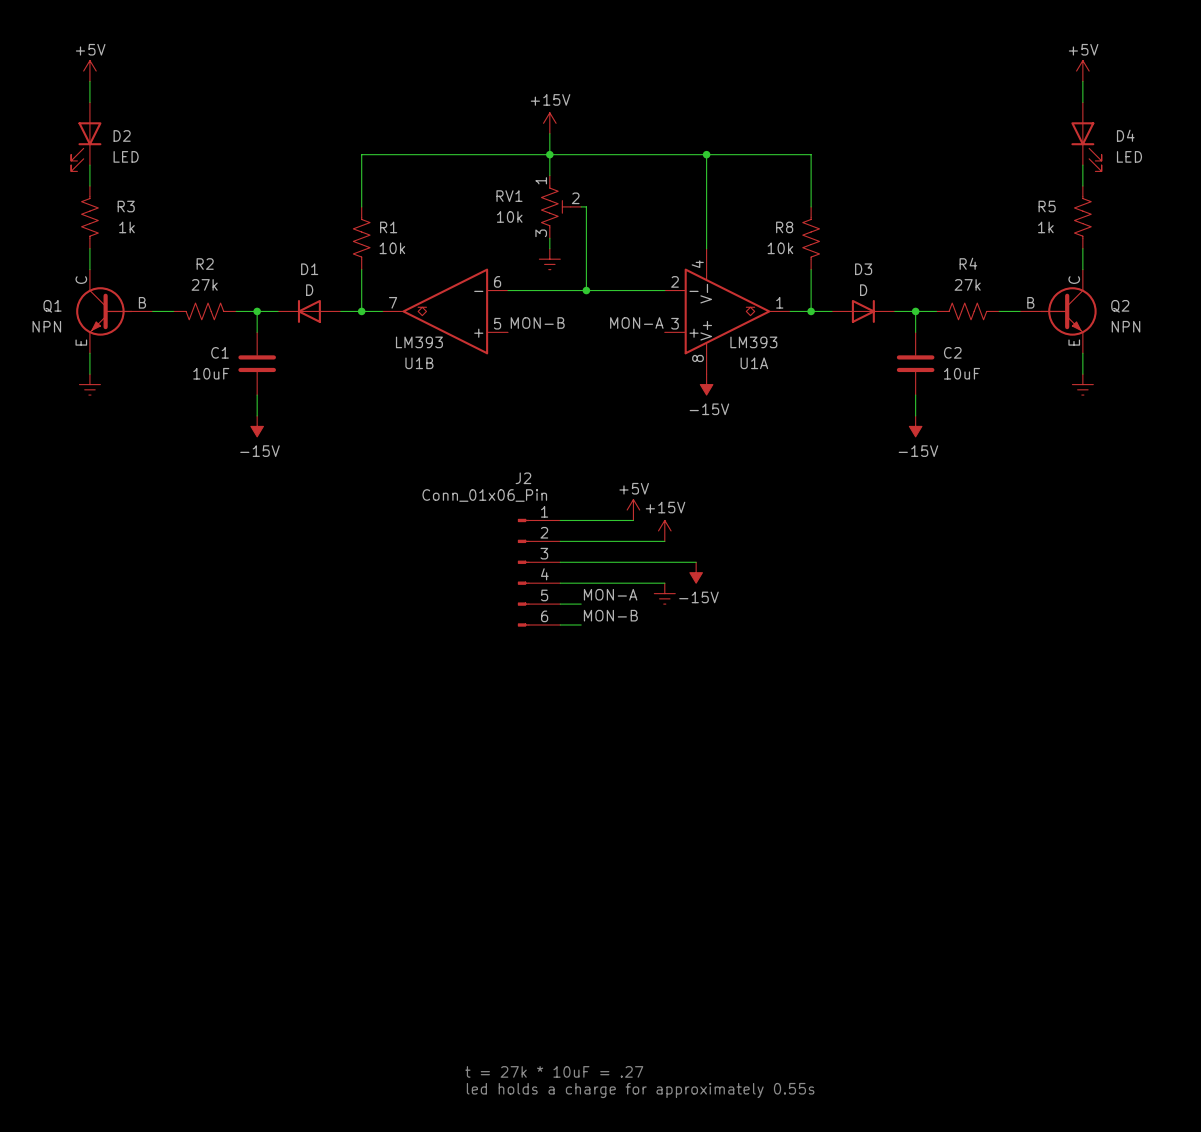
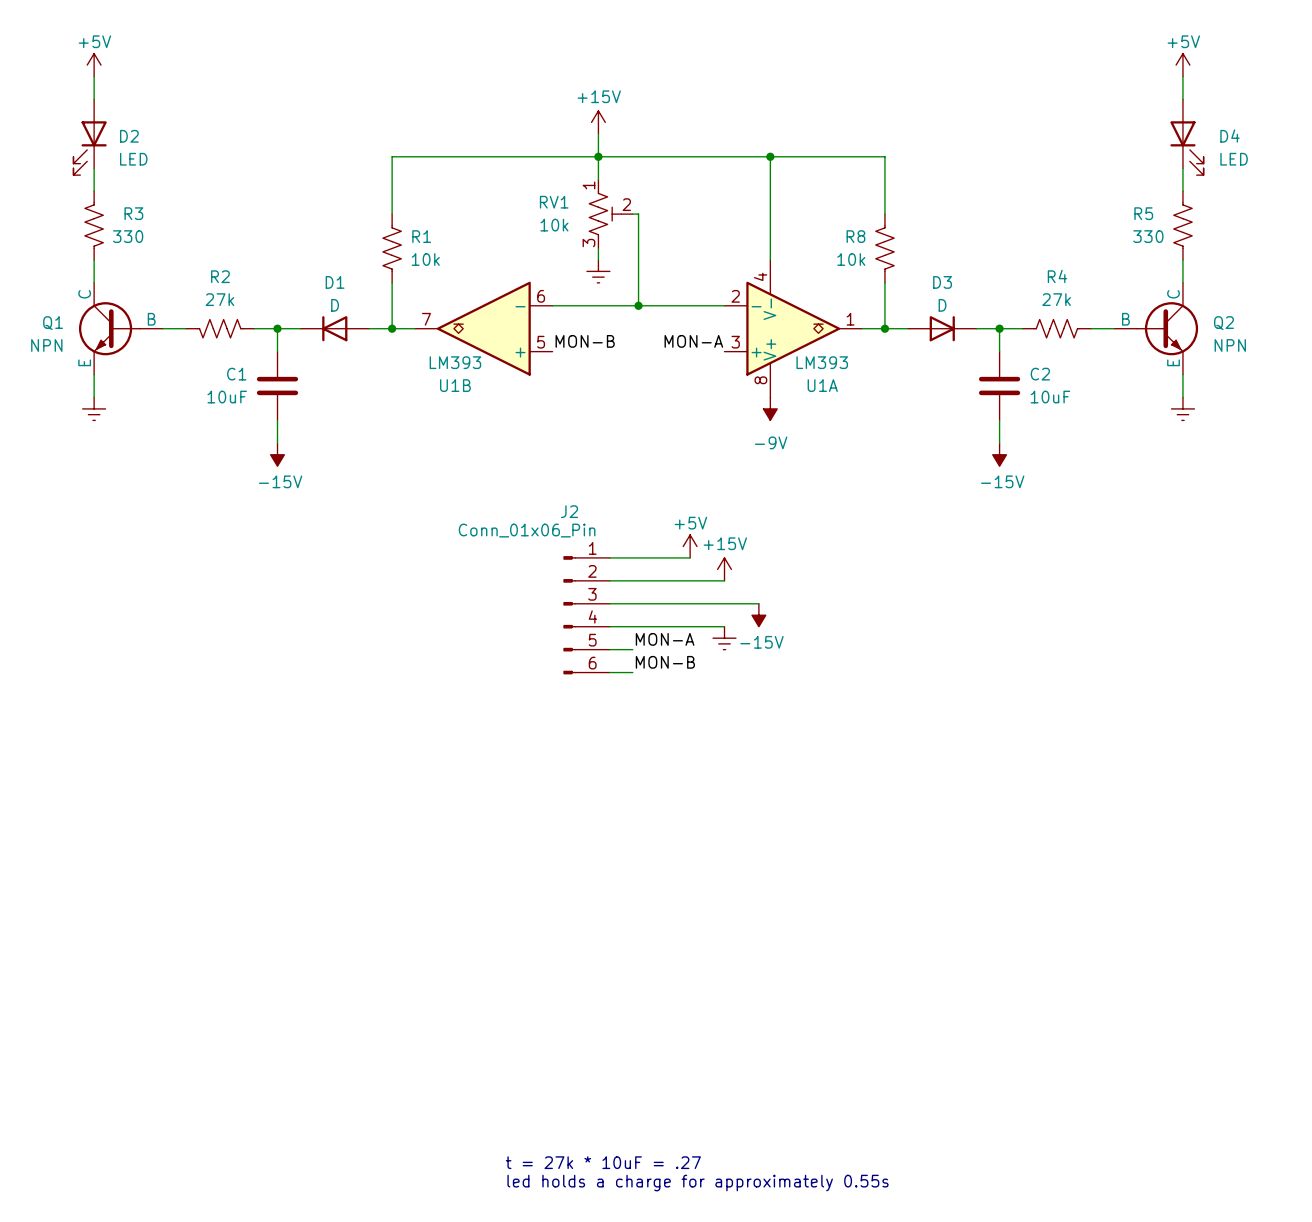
R3 value: 1k (126, 227) -> 330 (128, 236)
R5 value: 1k (1045, 227) -> 330 (1148, 236)
power symbol: -15V (706, 384) -> -9V (770, 408)

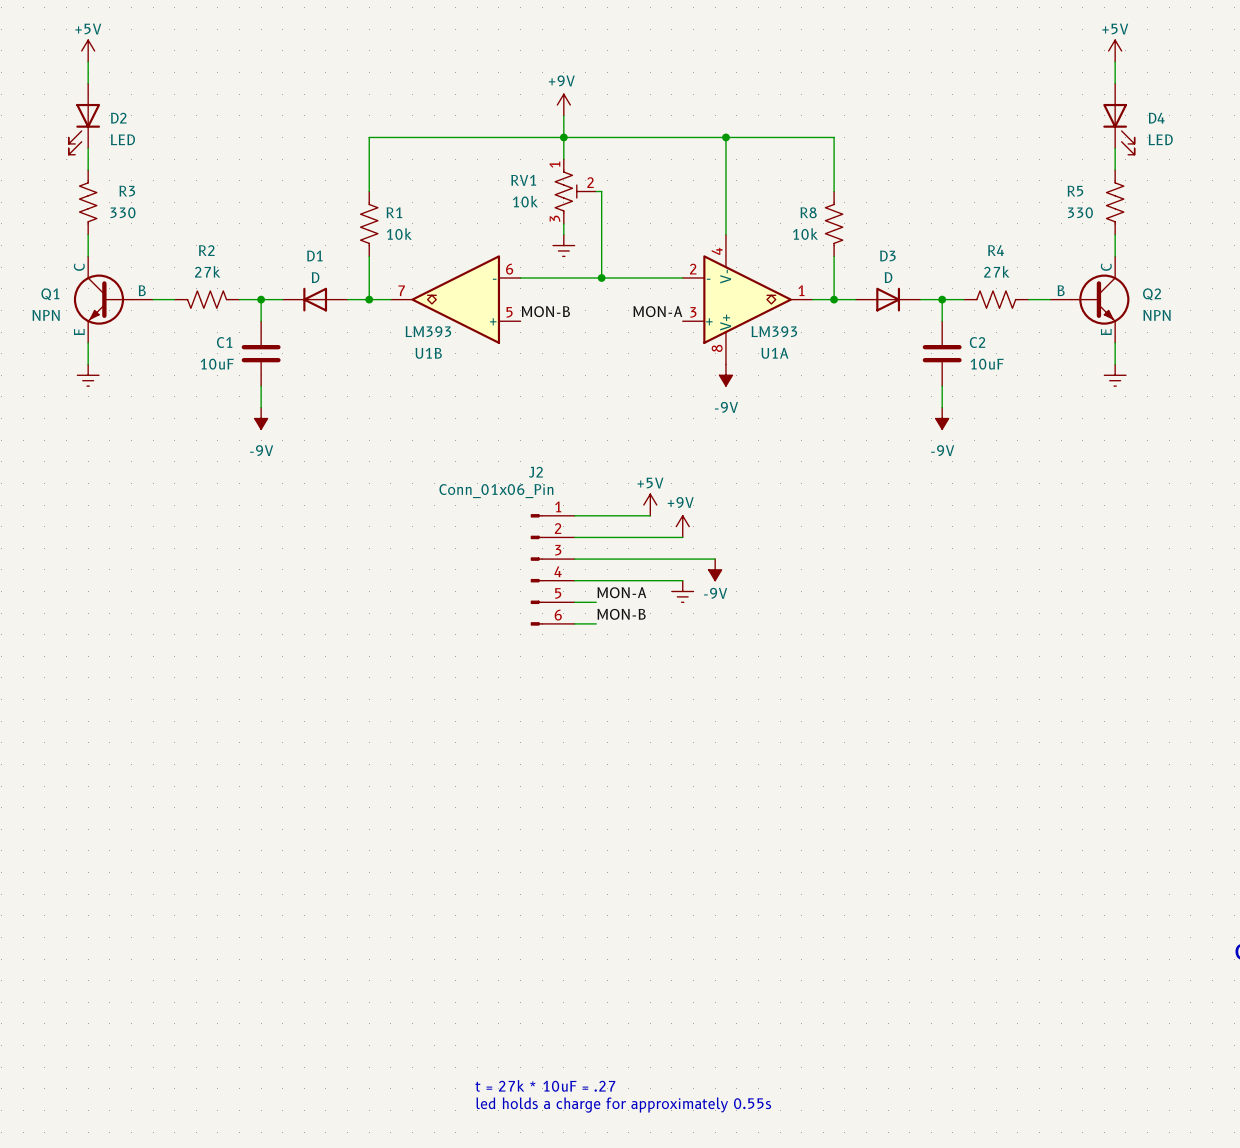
power symbol: +15V (598, 122) -> +9V (563, 105)
power symbol: -15V (277, 454) -> -9V (261, 418)
power symbol: -15V (999, 454) -> -9V (942, 418)
power symbol: +15V (724, 569) -> +9V (682, 526)
power symbol: -15V (758, 615) -> -9V (715, 569)

